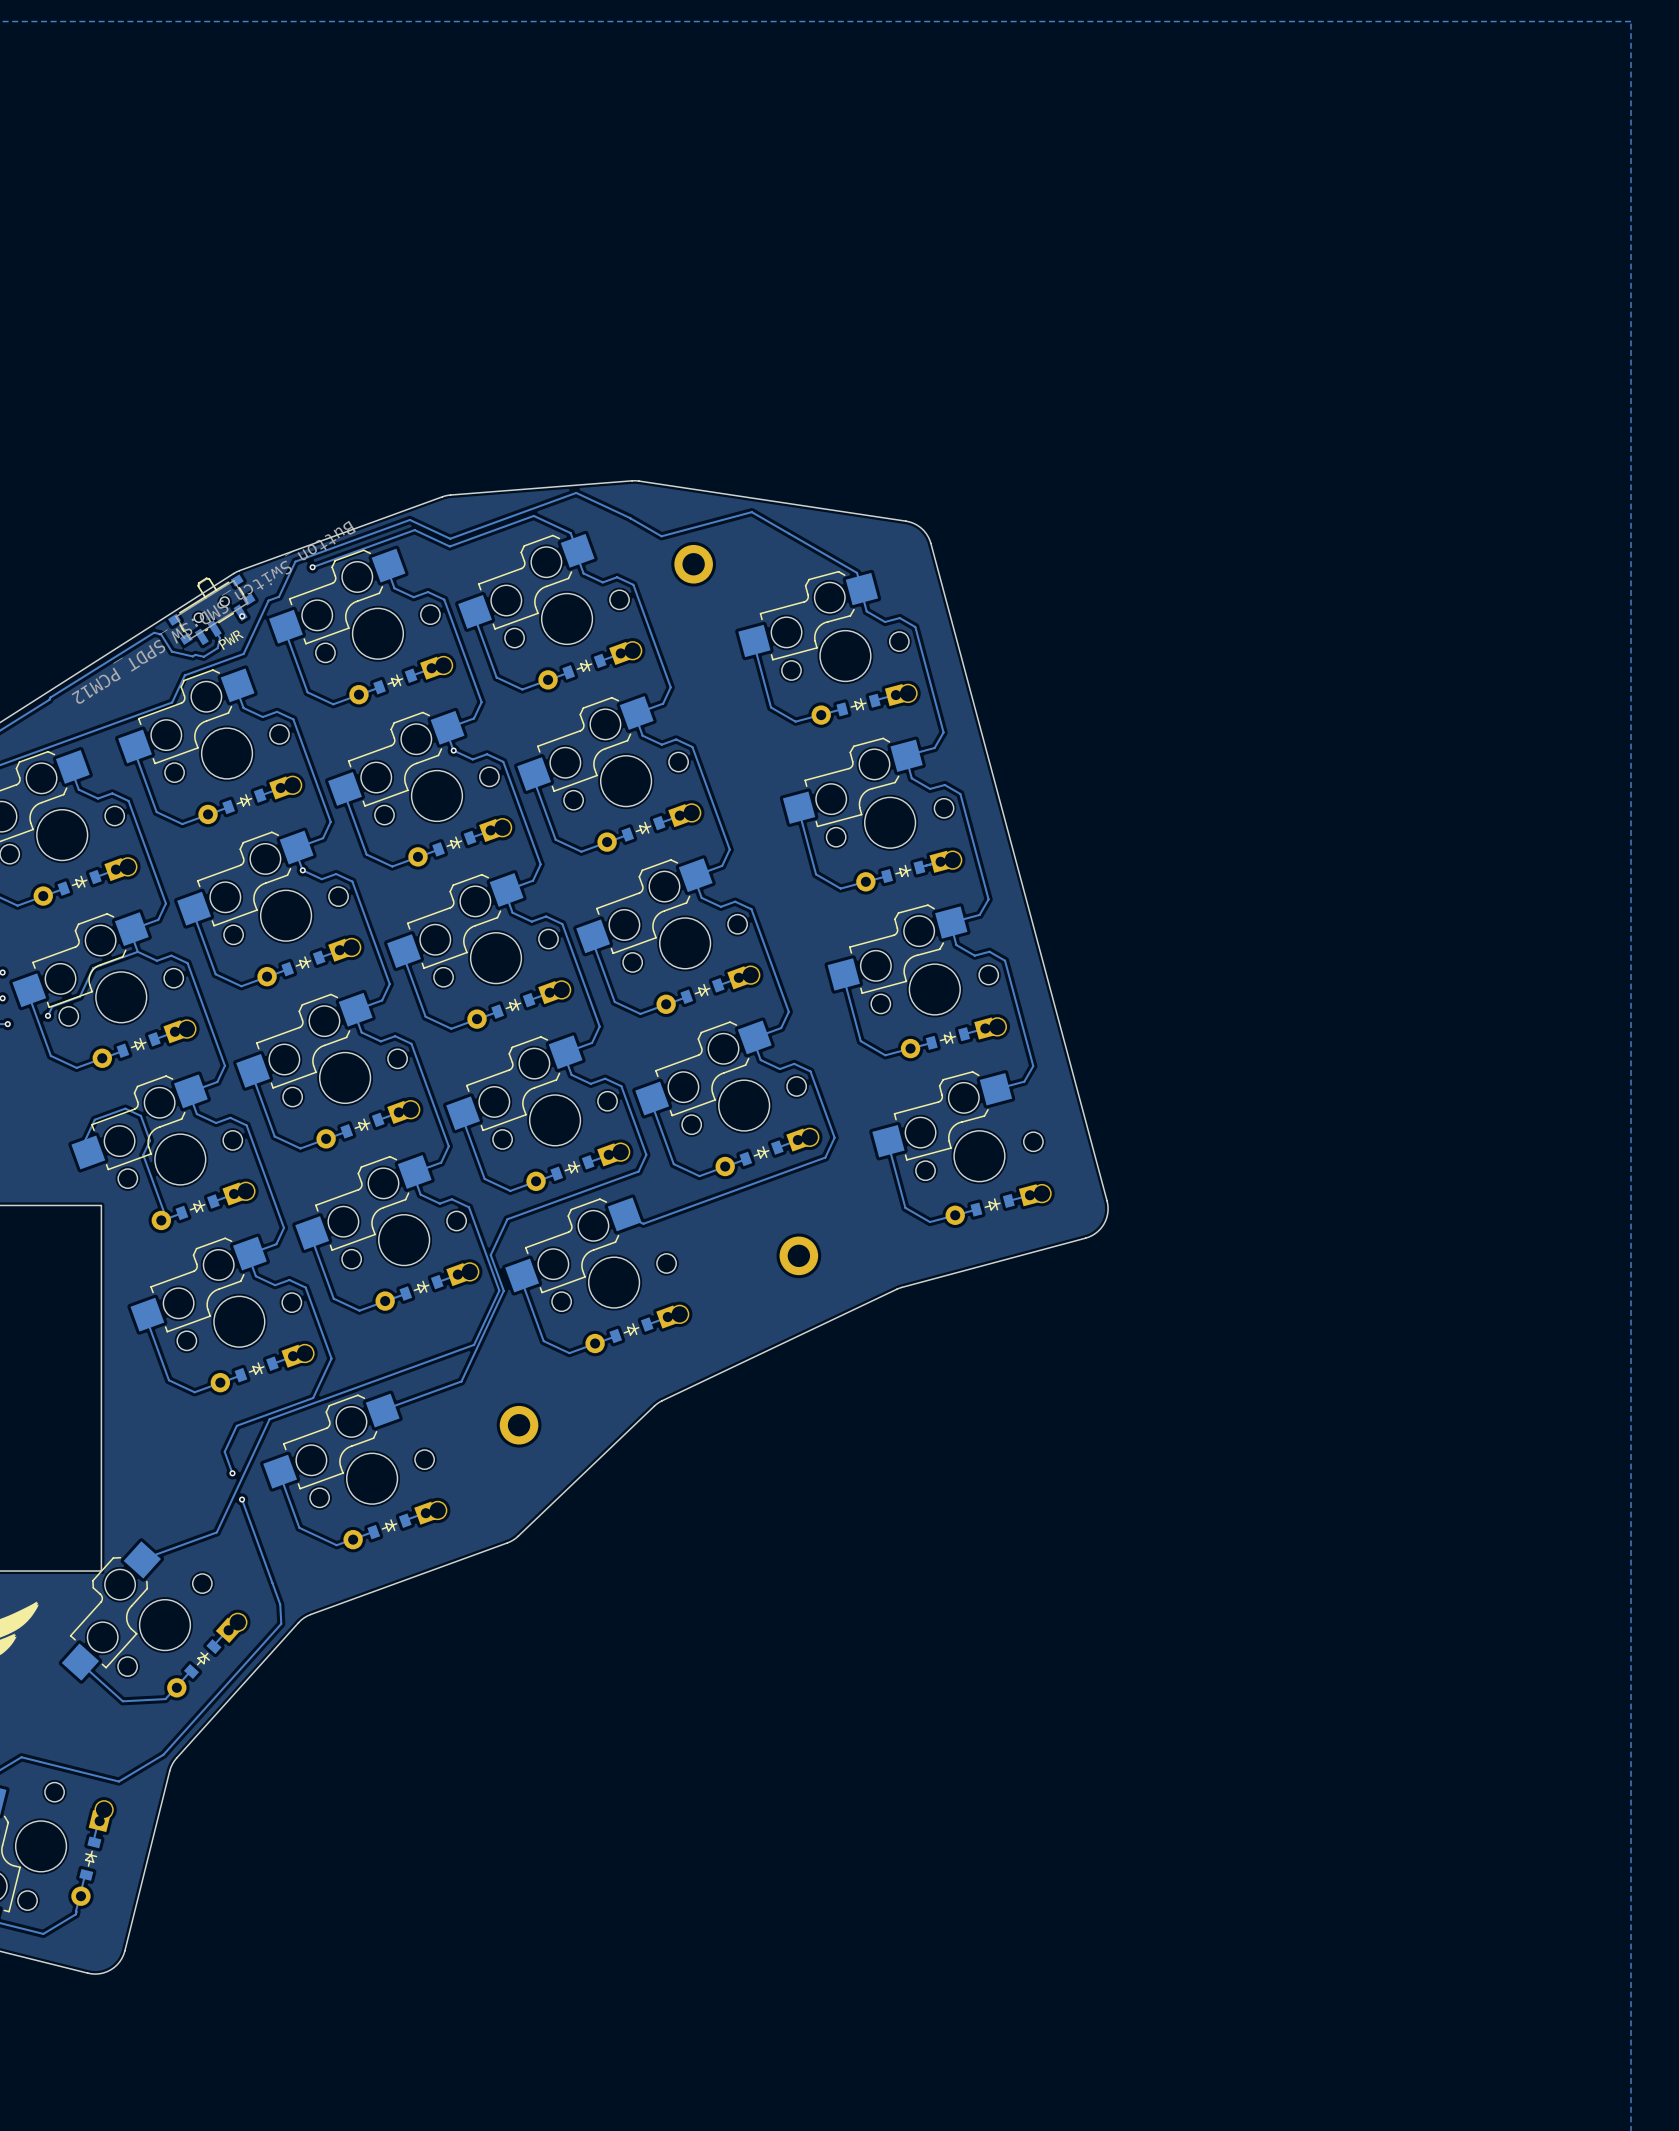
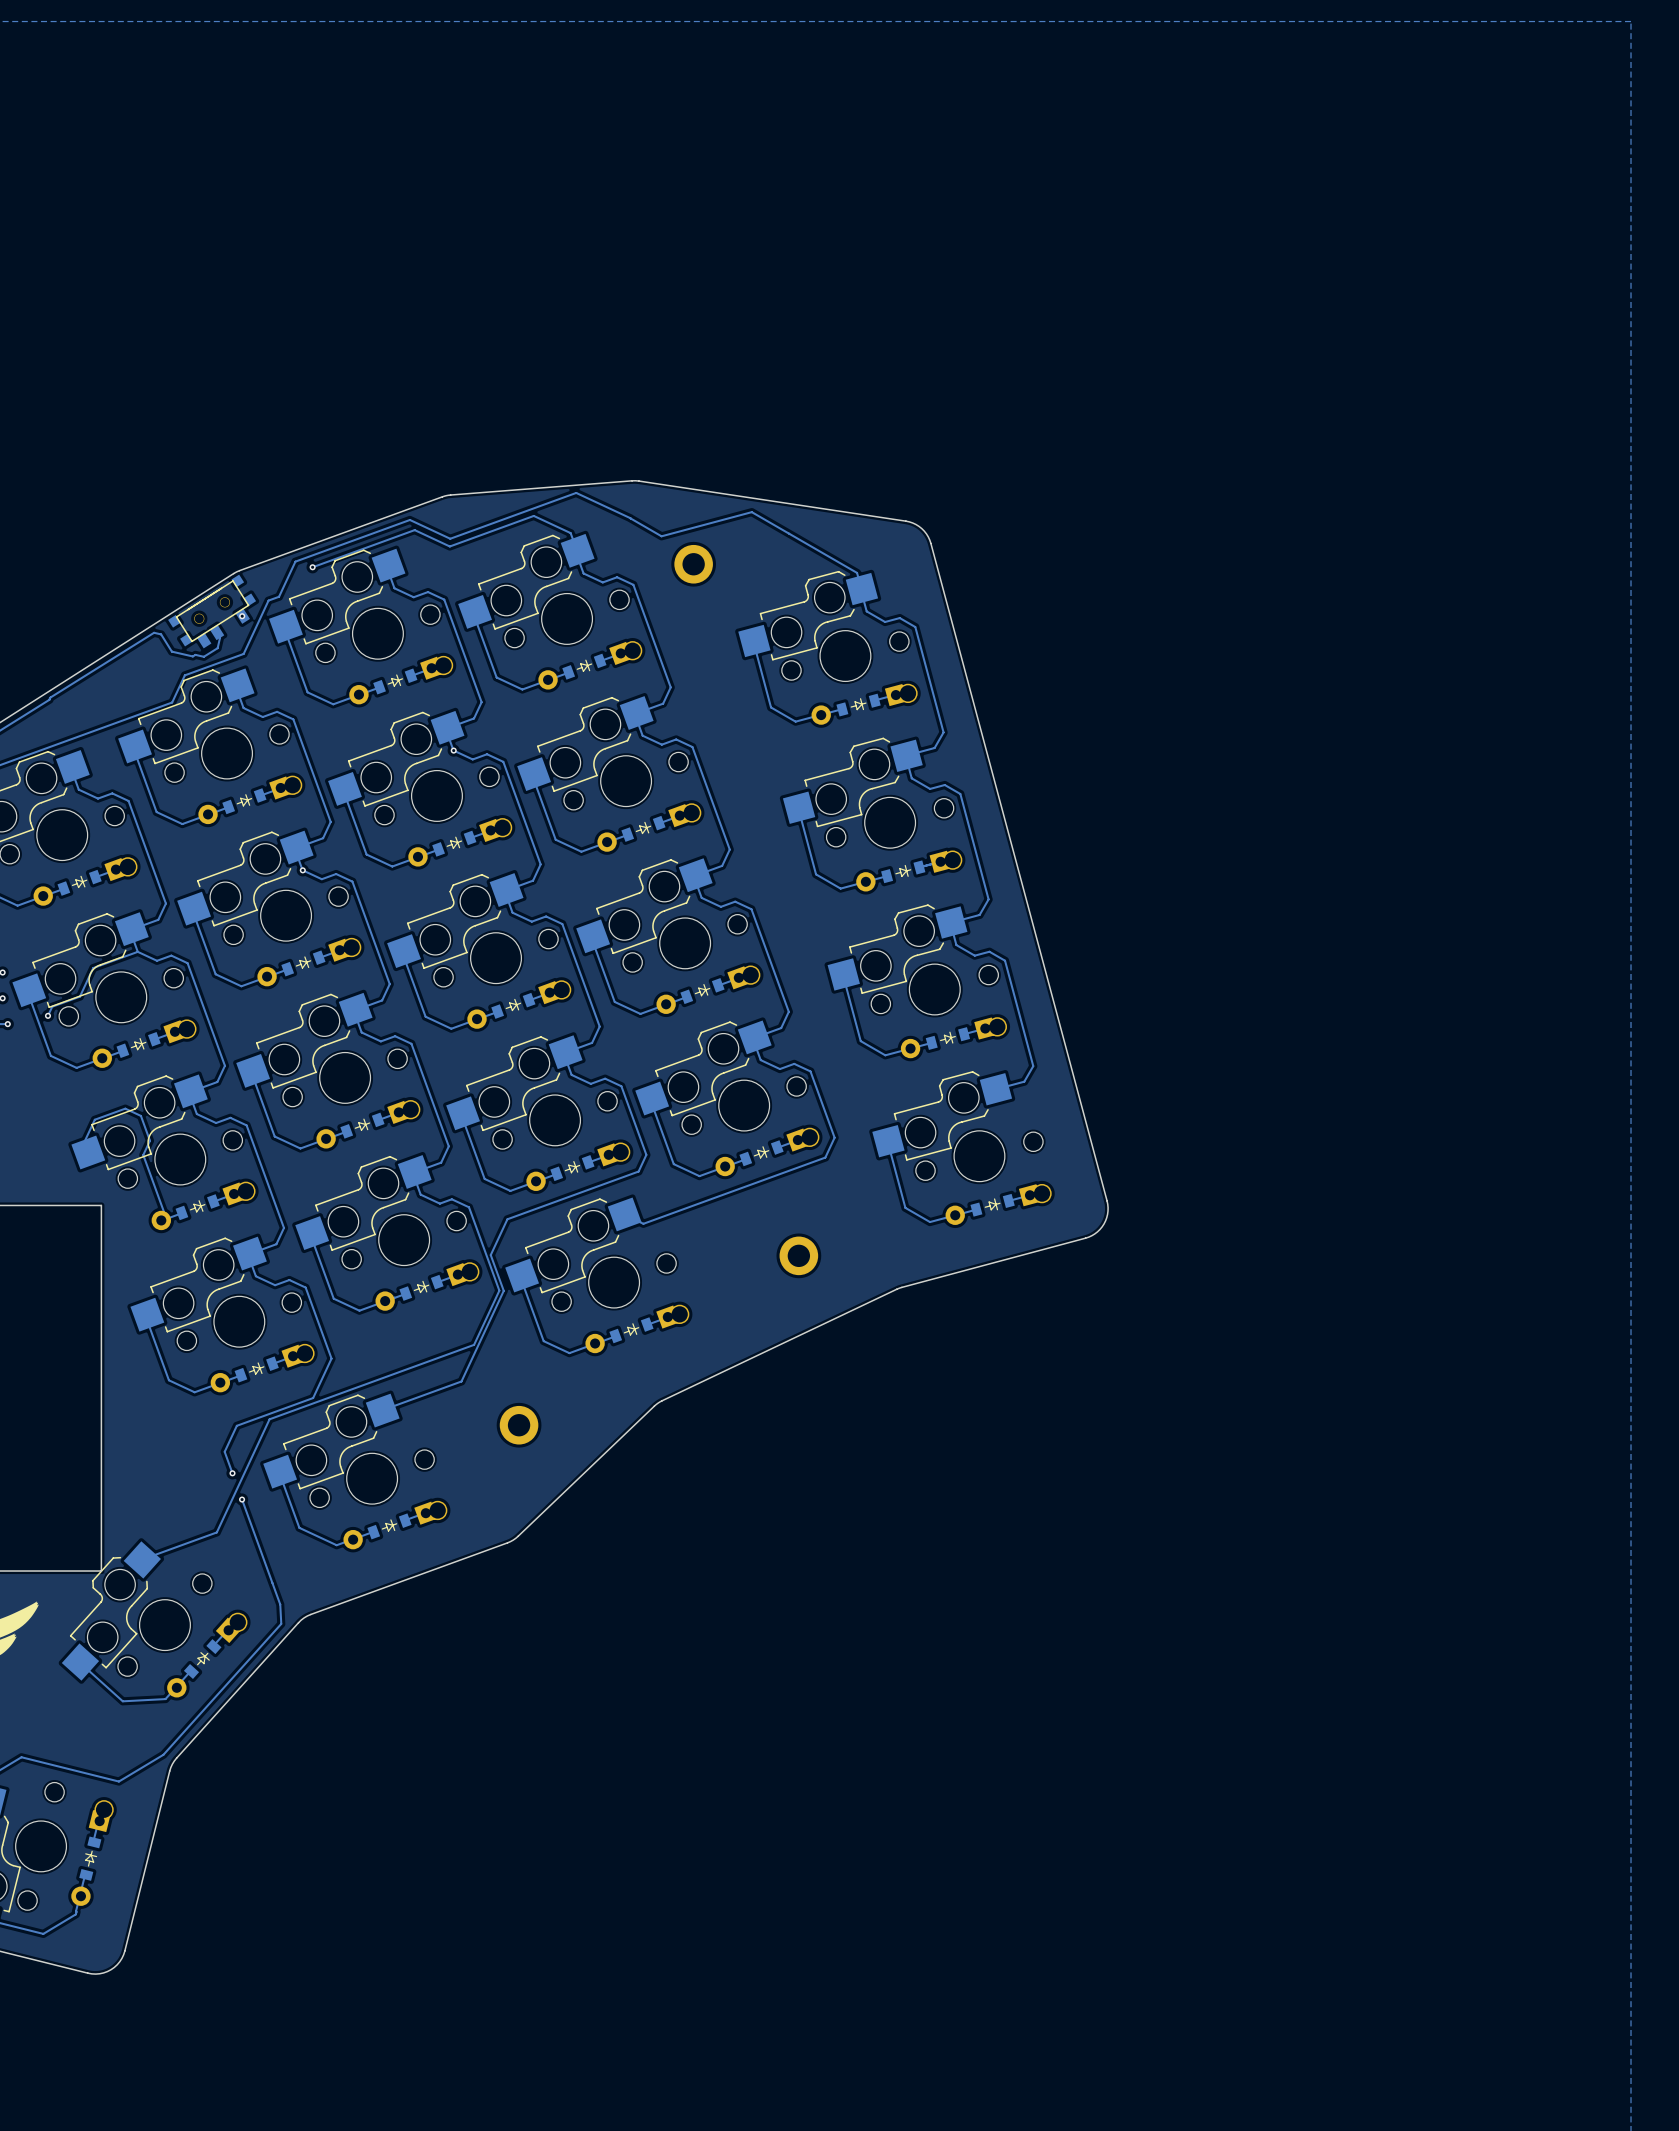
PWR: (211, 609) -> none
part: none -> (212, 611)

